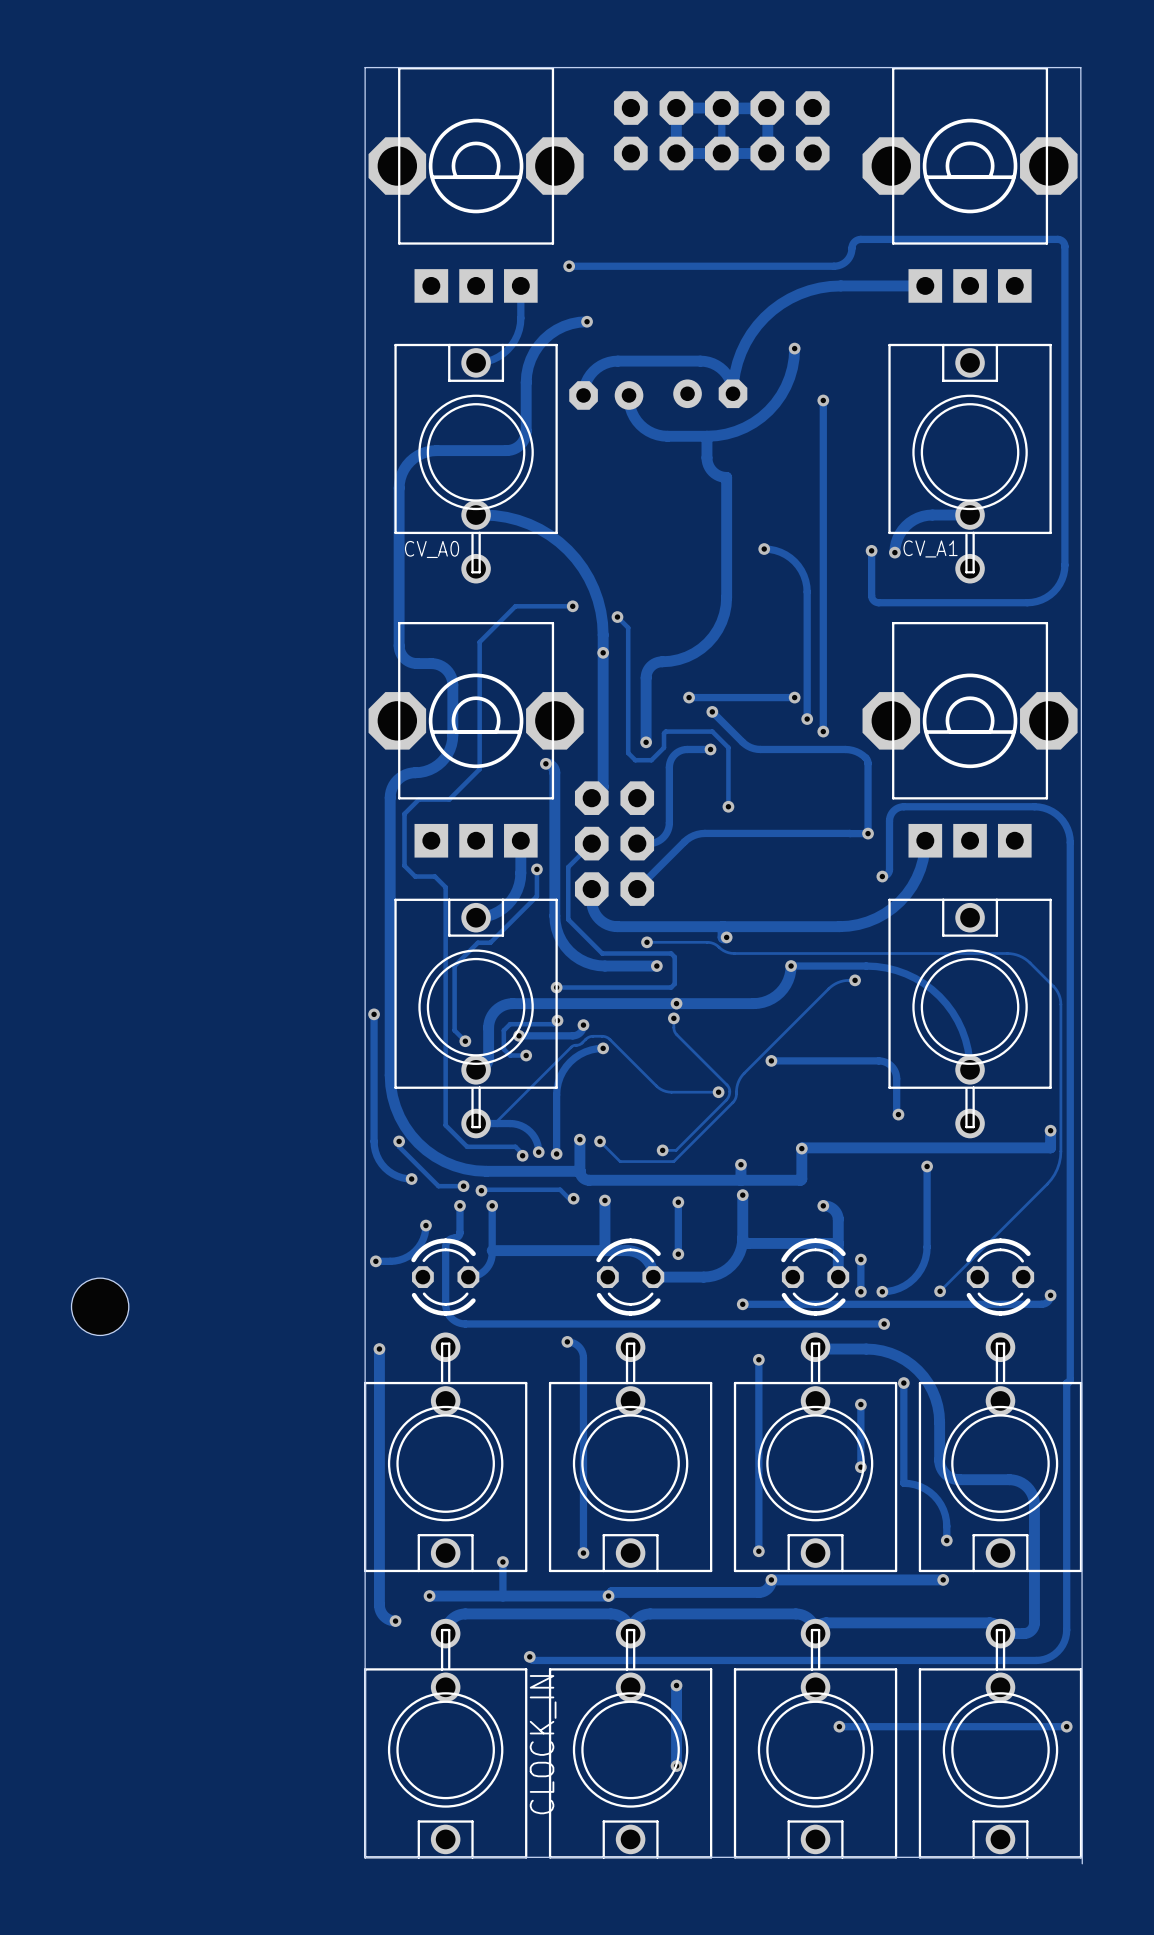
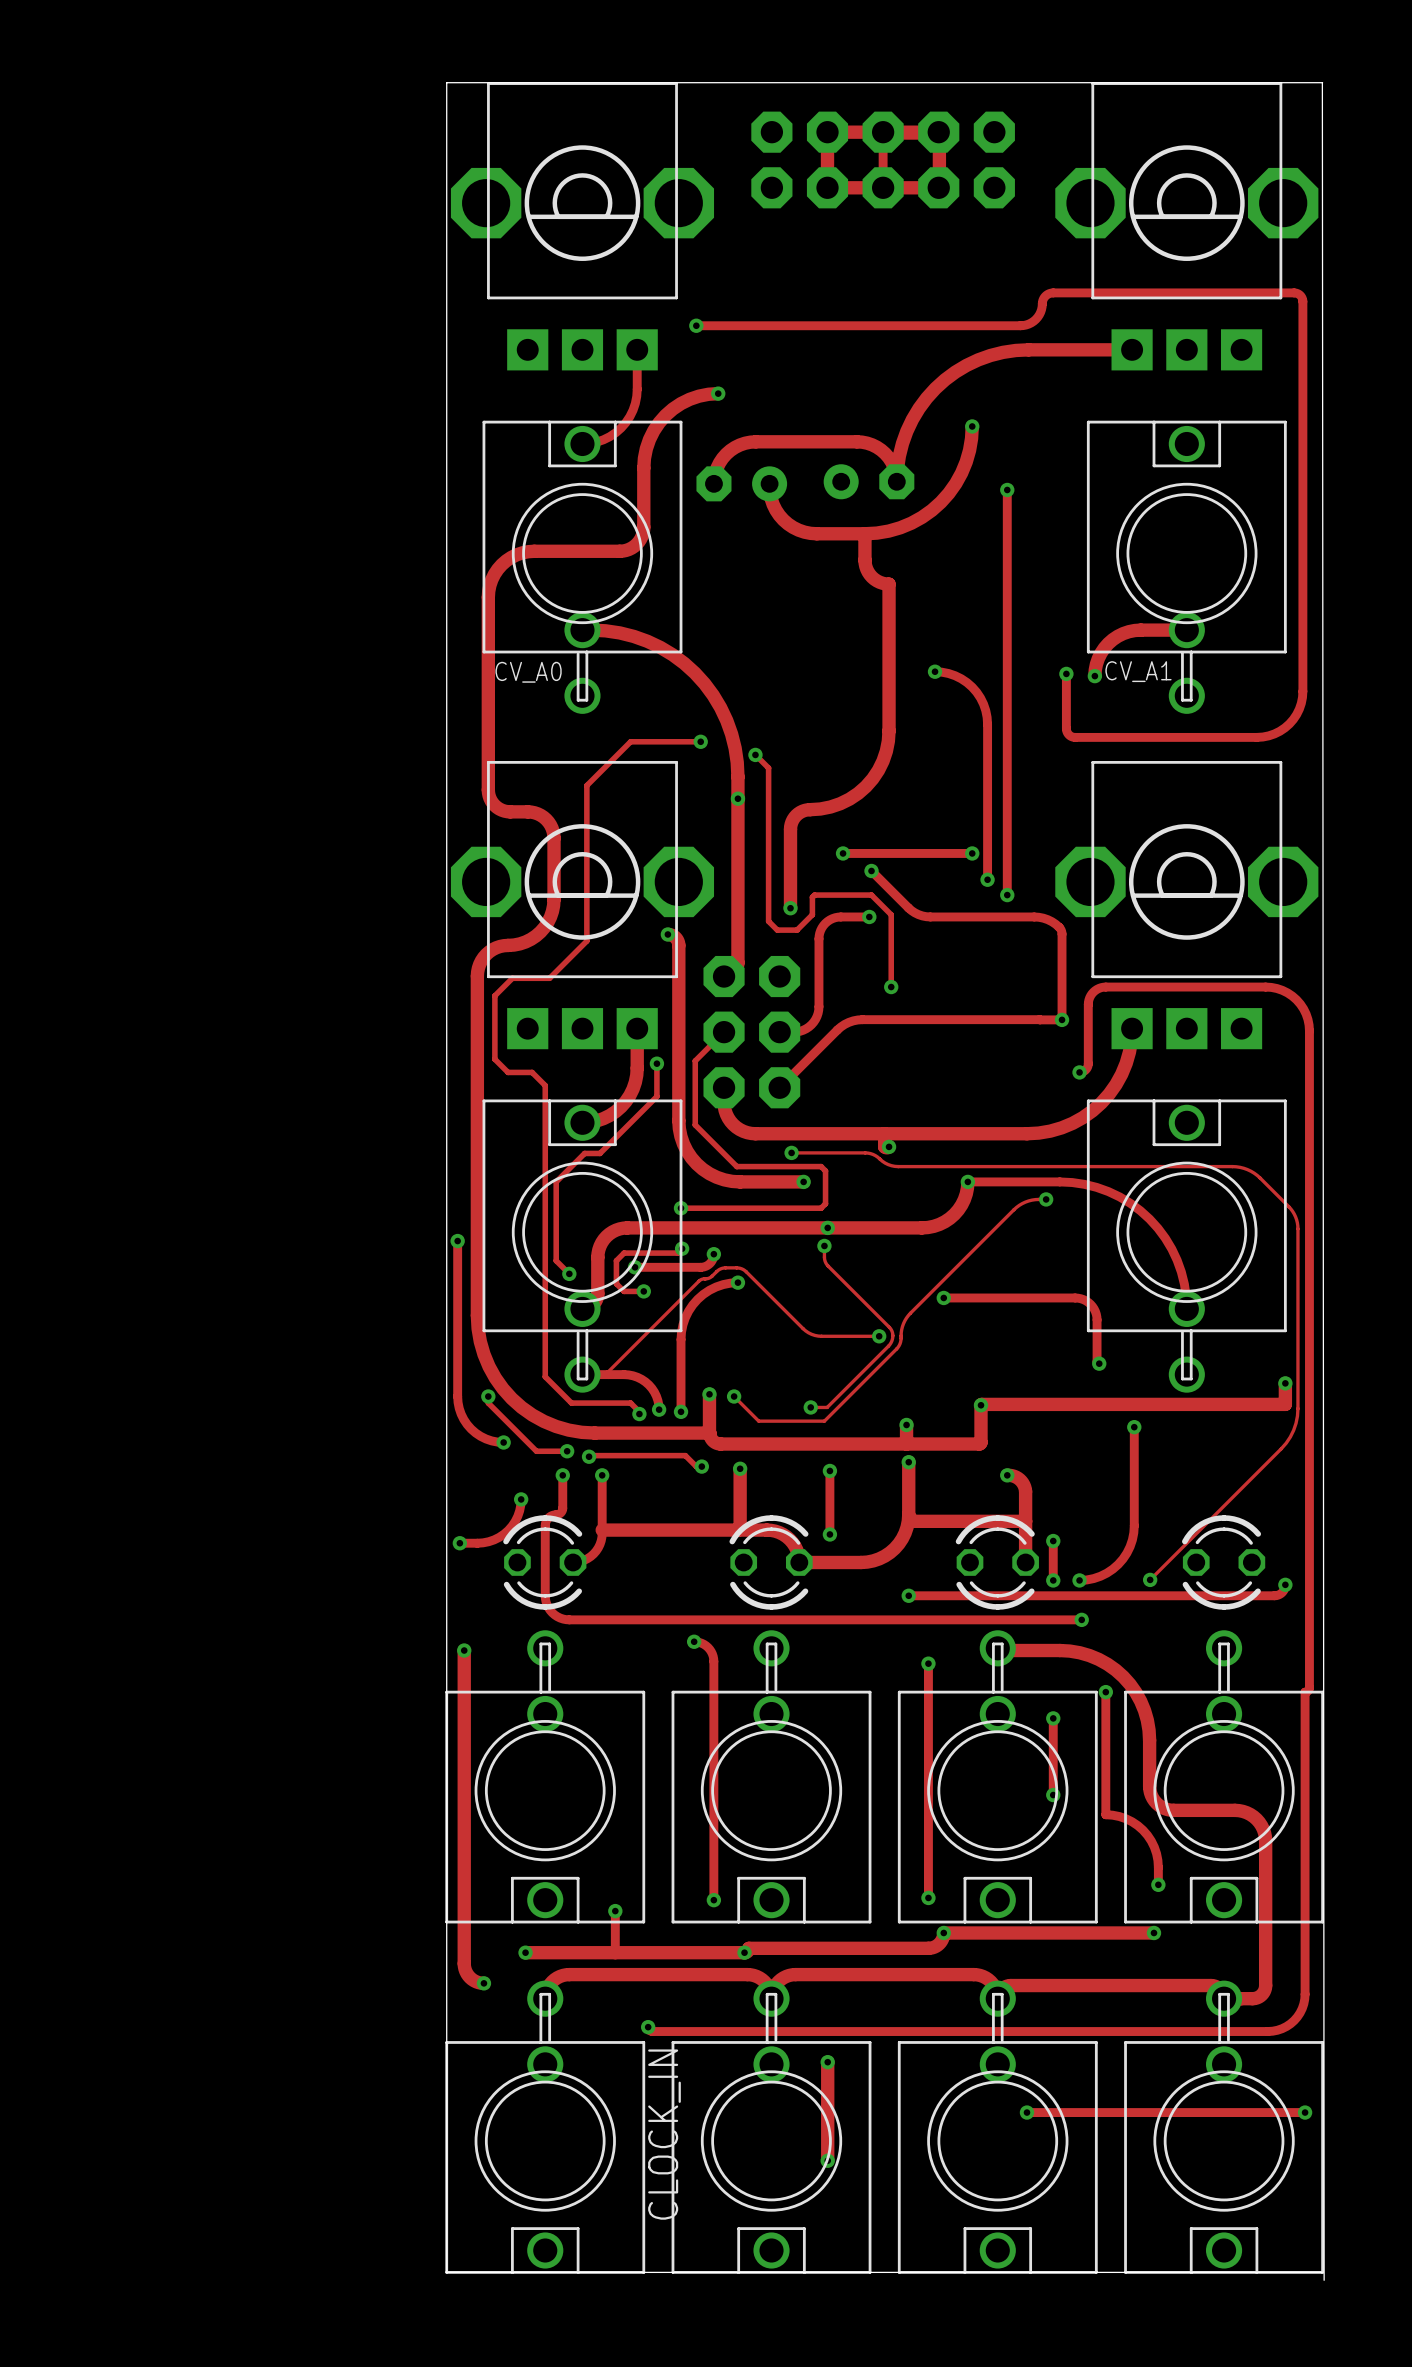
hole: (100, 1306) -> none

